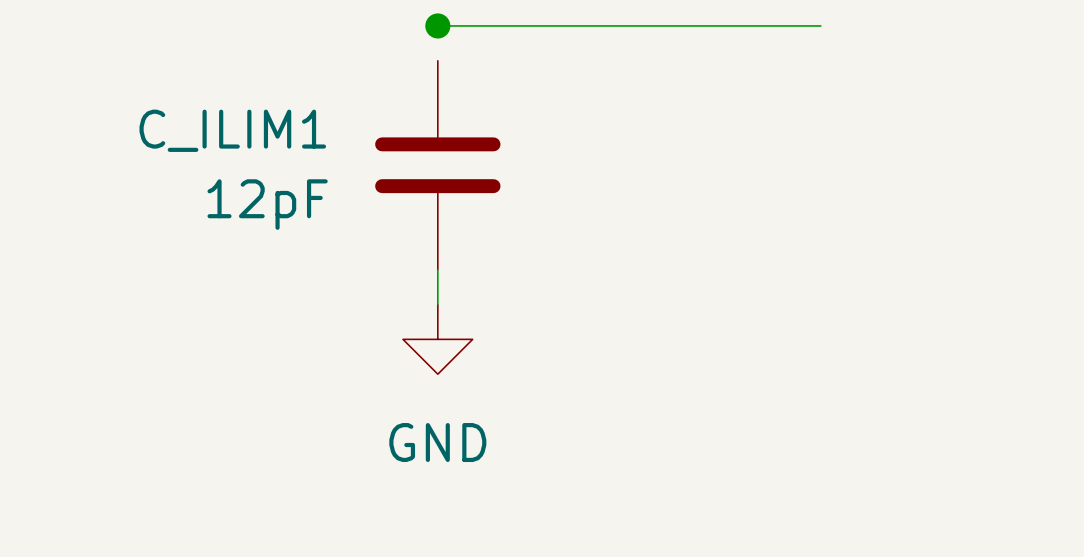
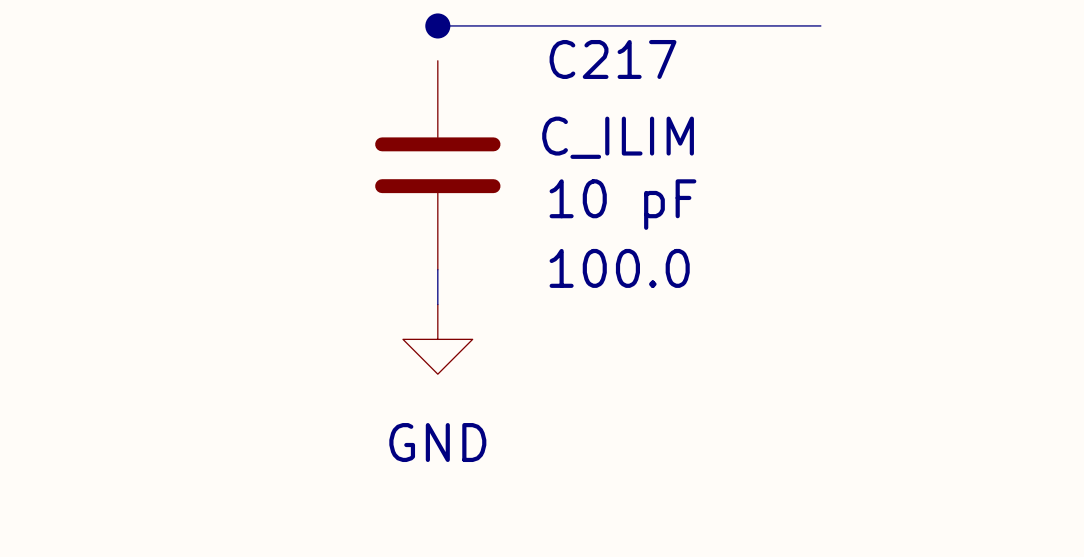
C_ILIM1 name: C_ILIM1 (232, 130) -> C217 (613, 59)
C_ILIM1 text: none -> C_ILIM (618, 137)
C_ILIM1 value: 12pF (267, 204) -> none
C_ILIM1 text: none -> 10 pF (622, 204)
C_ILIM1 text: none -> 100.0 (619, 268)

